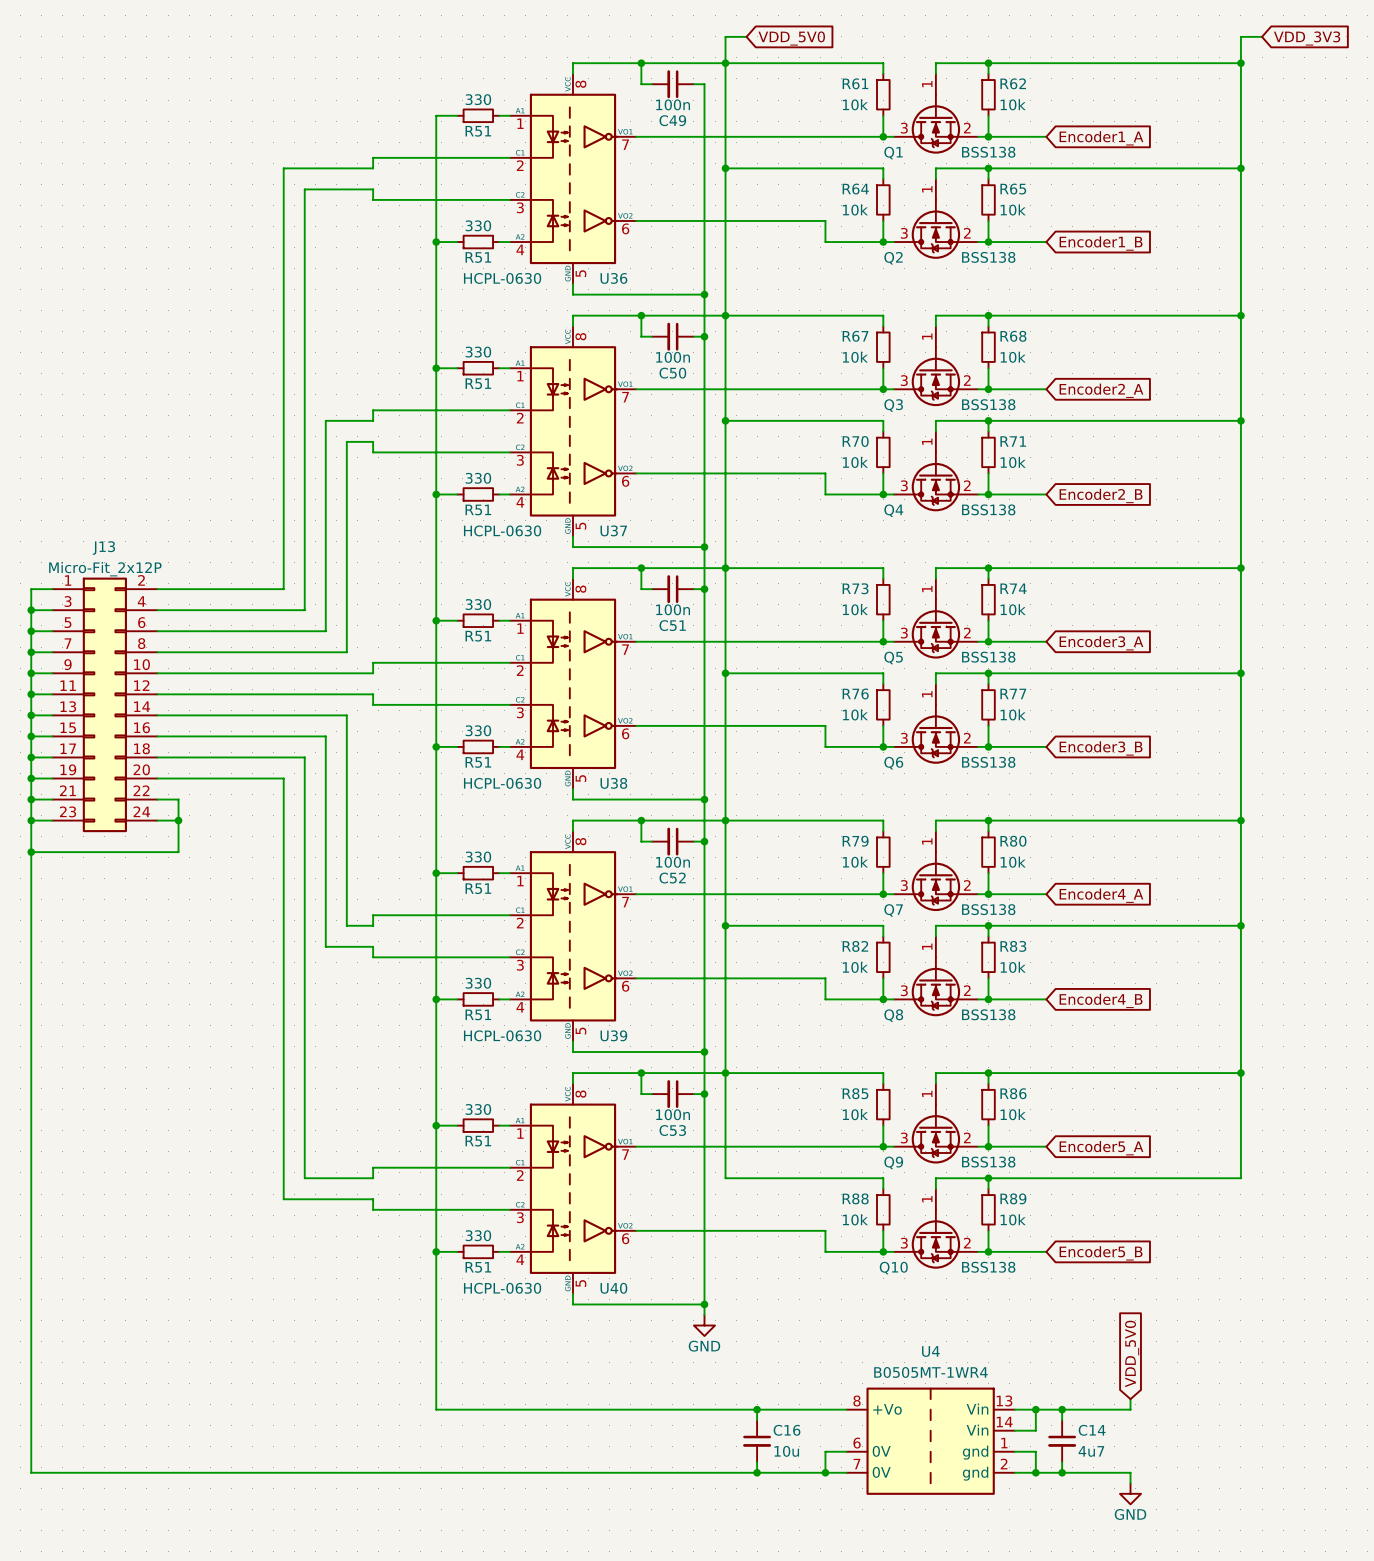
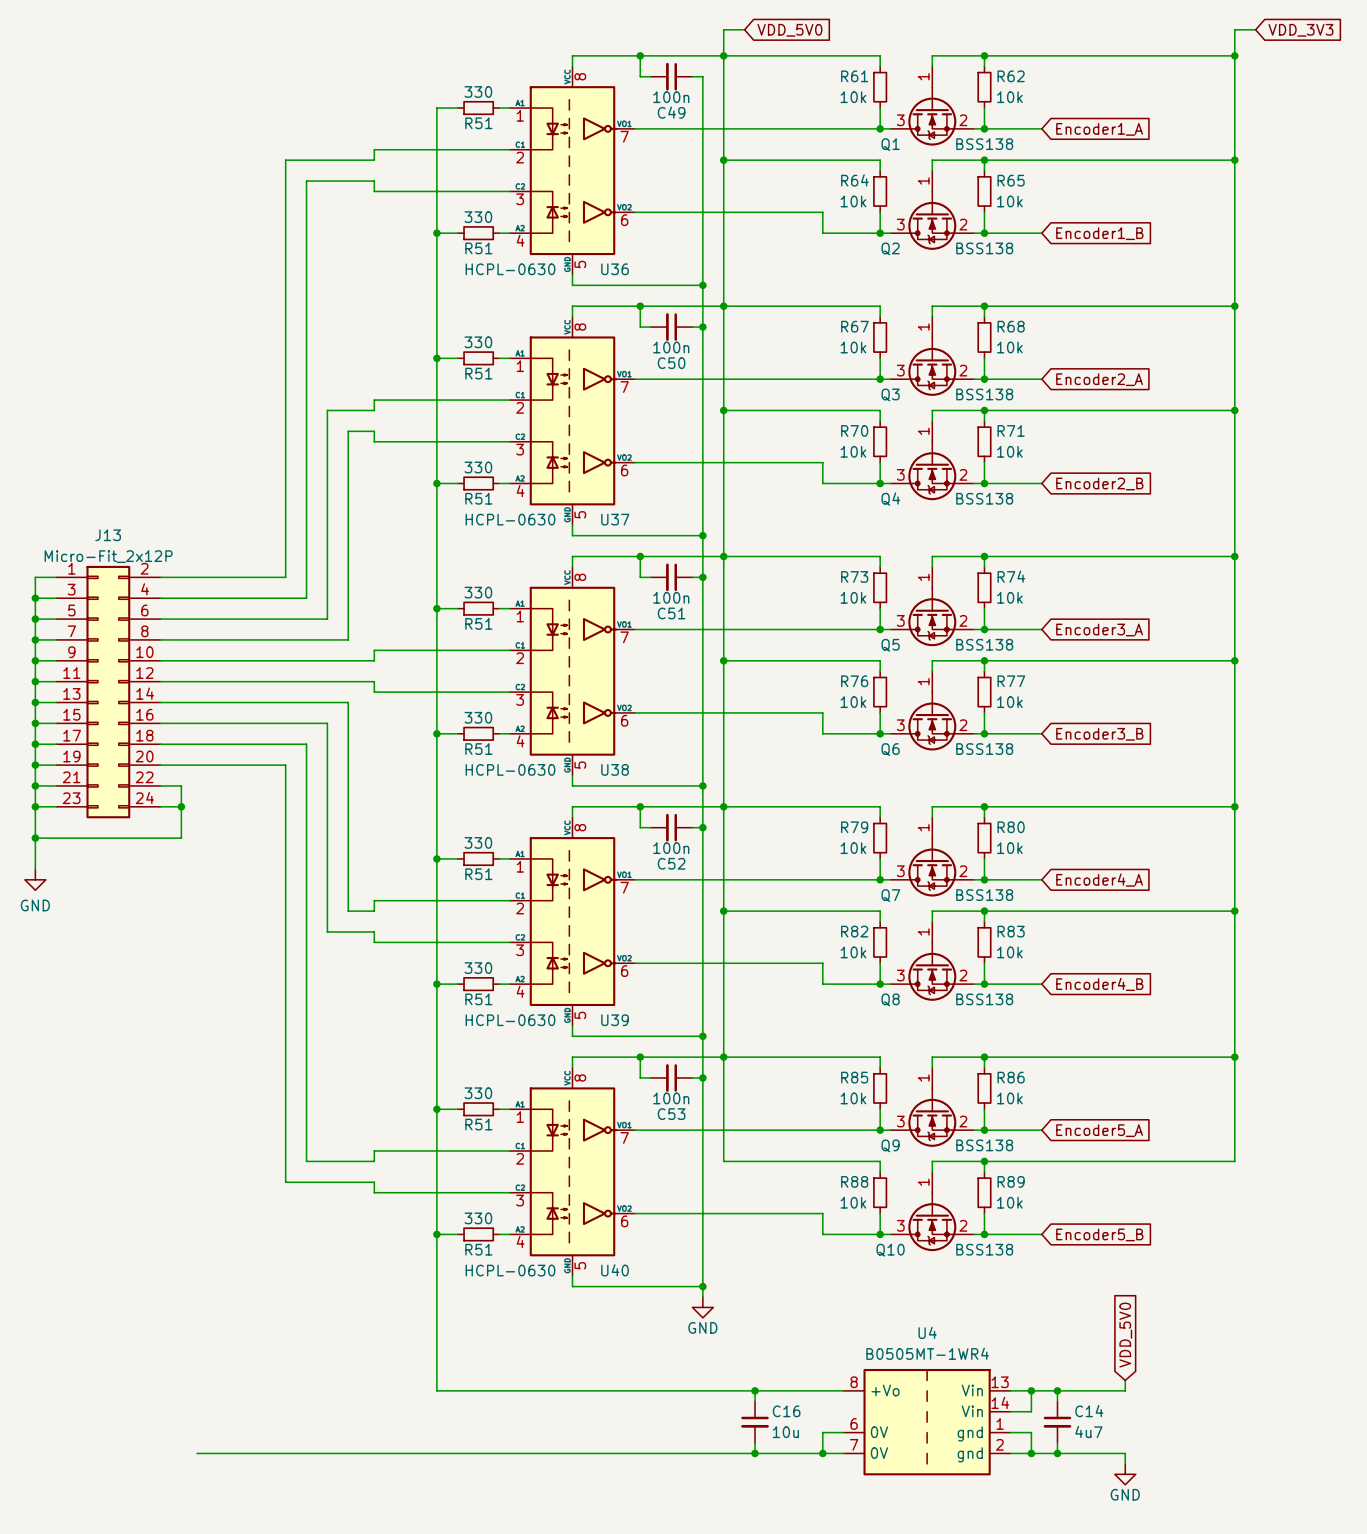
wire: (31, 883) (31, 1472) (194, 1472) -> none
power symbol: none -> GND (35, 879)

